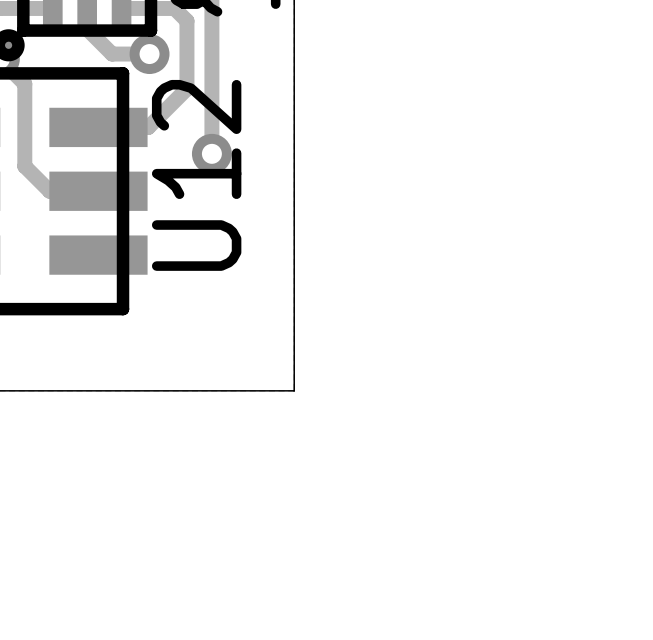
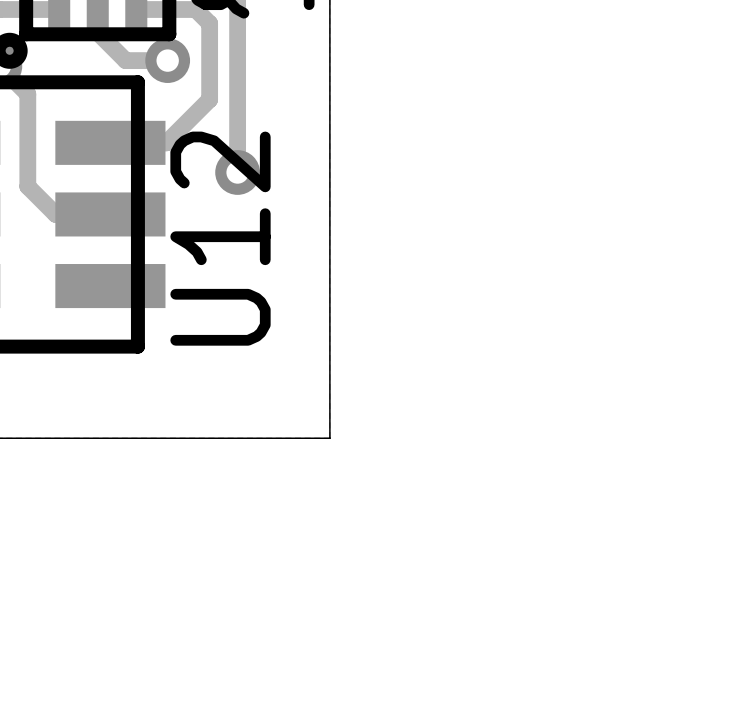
U12 name position: U12 (196, 175) -> U12 (220, 238)

